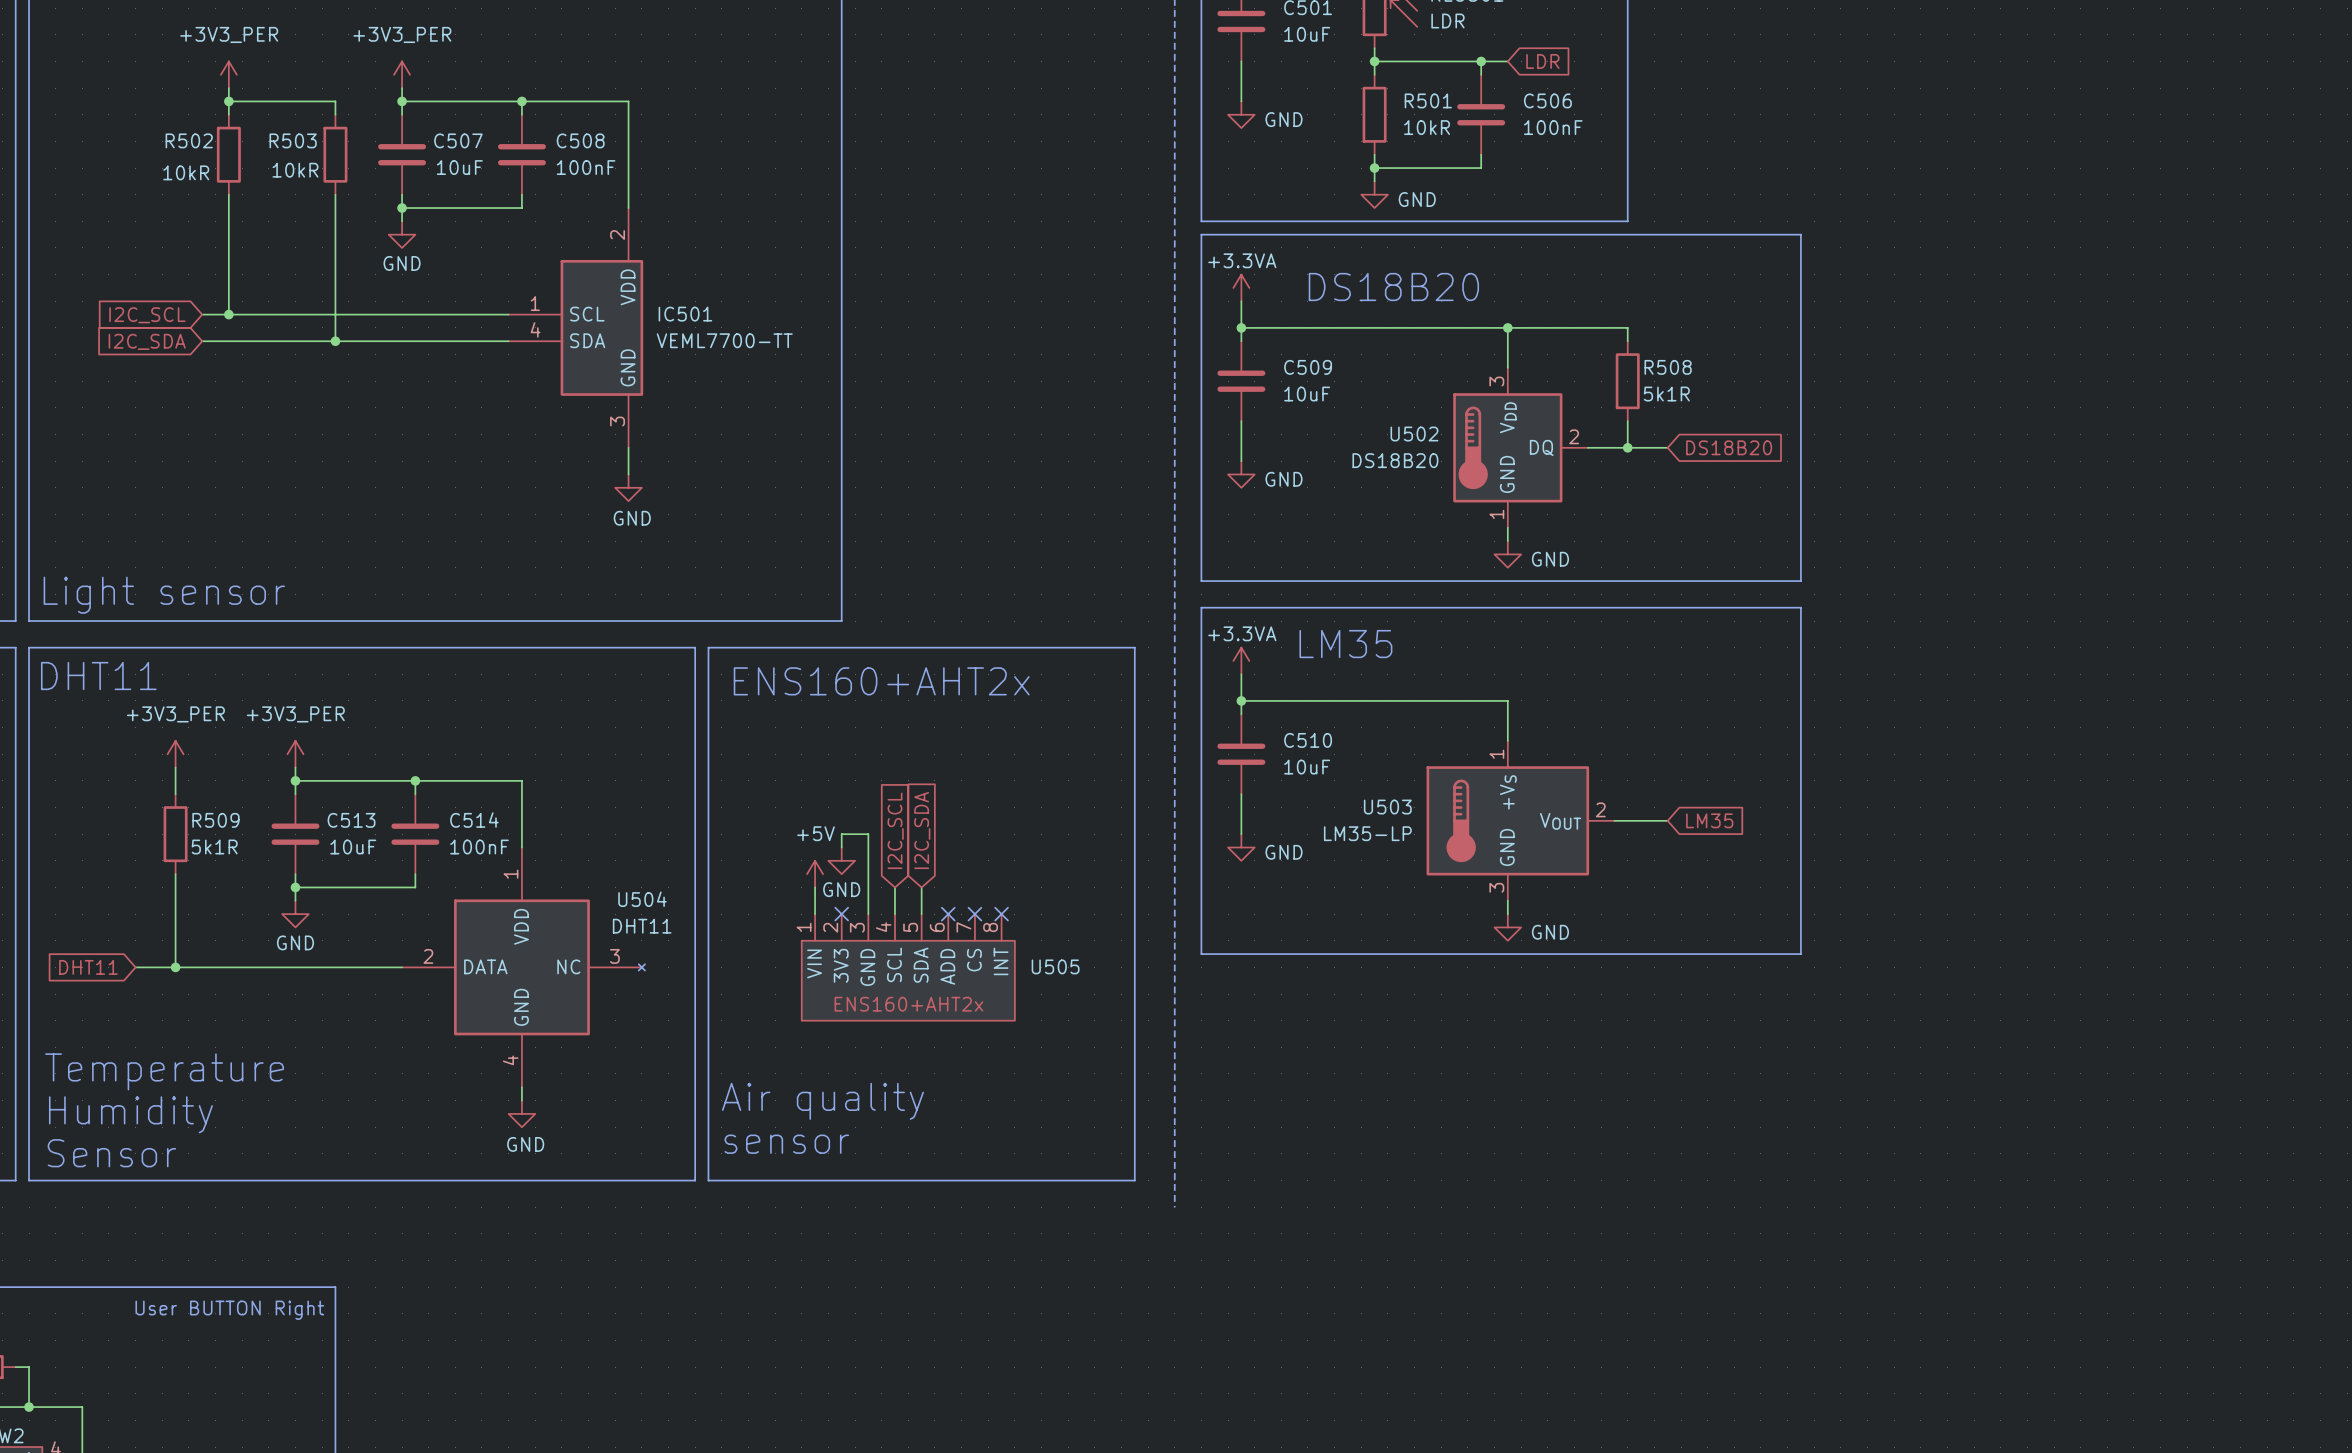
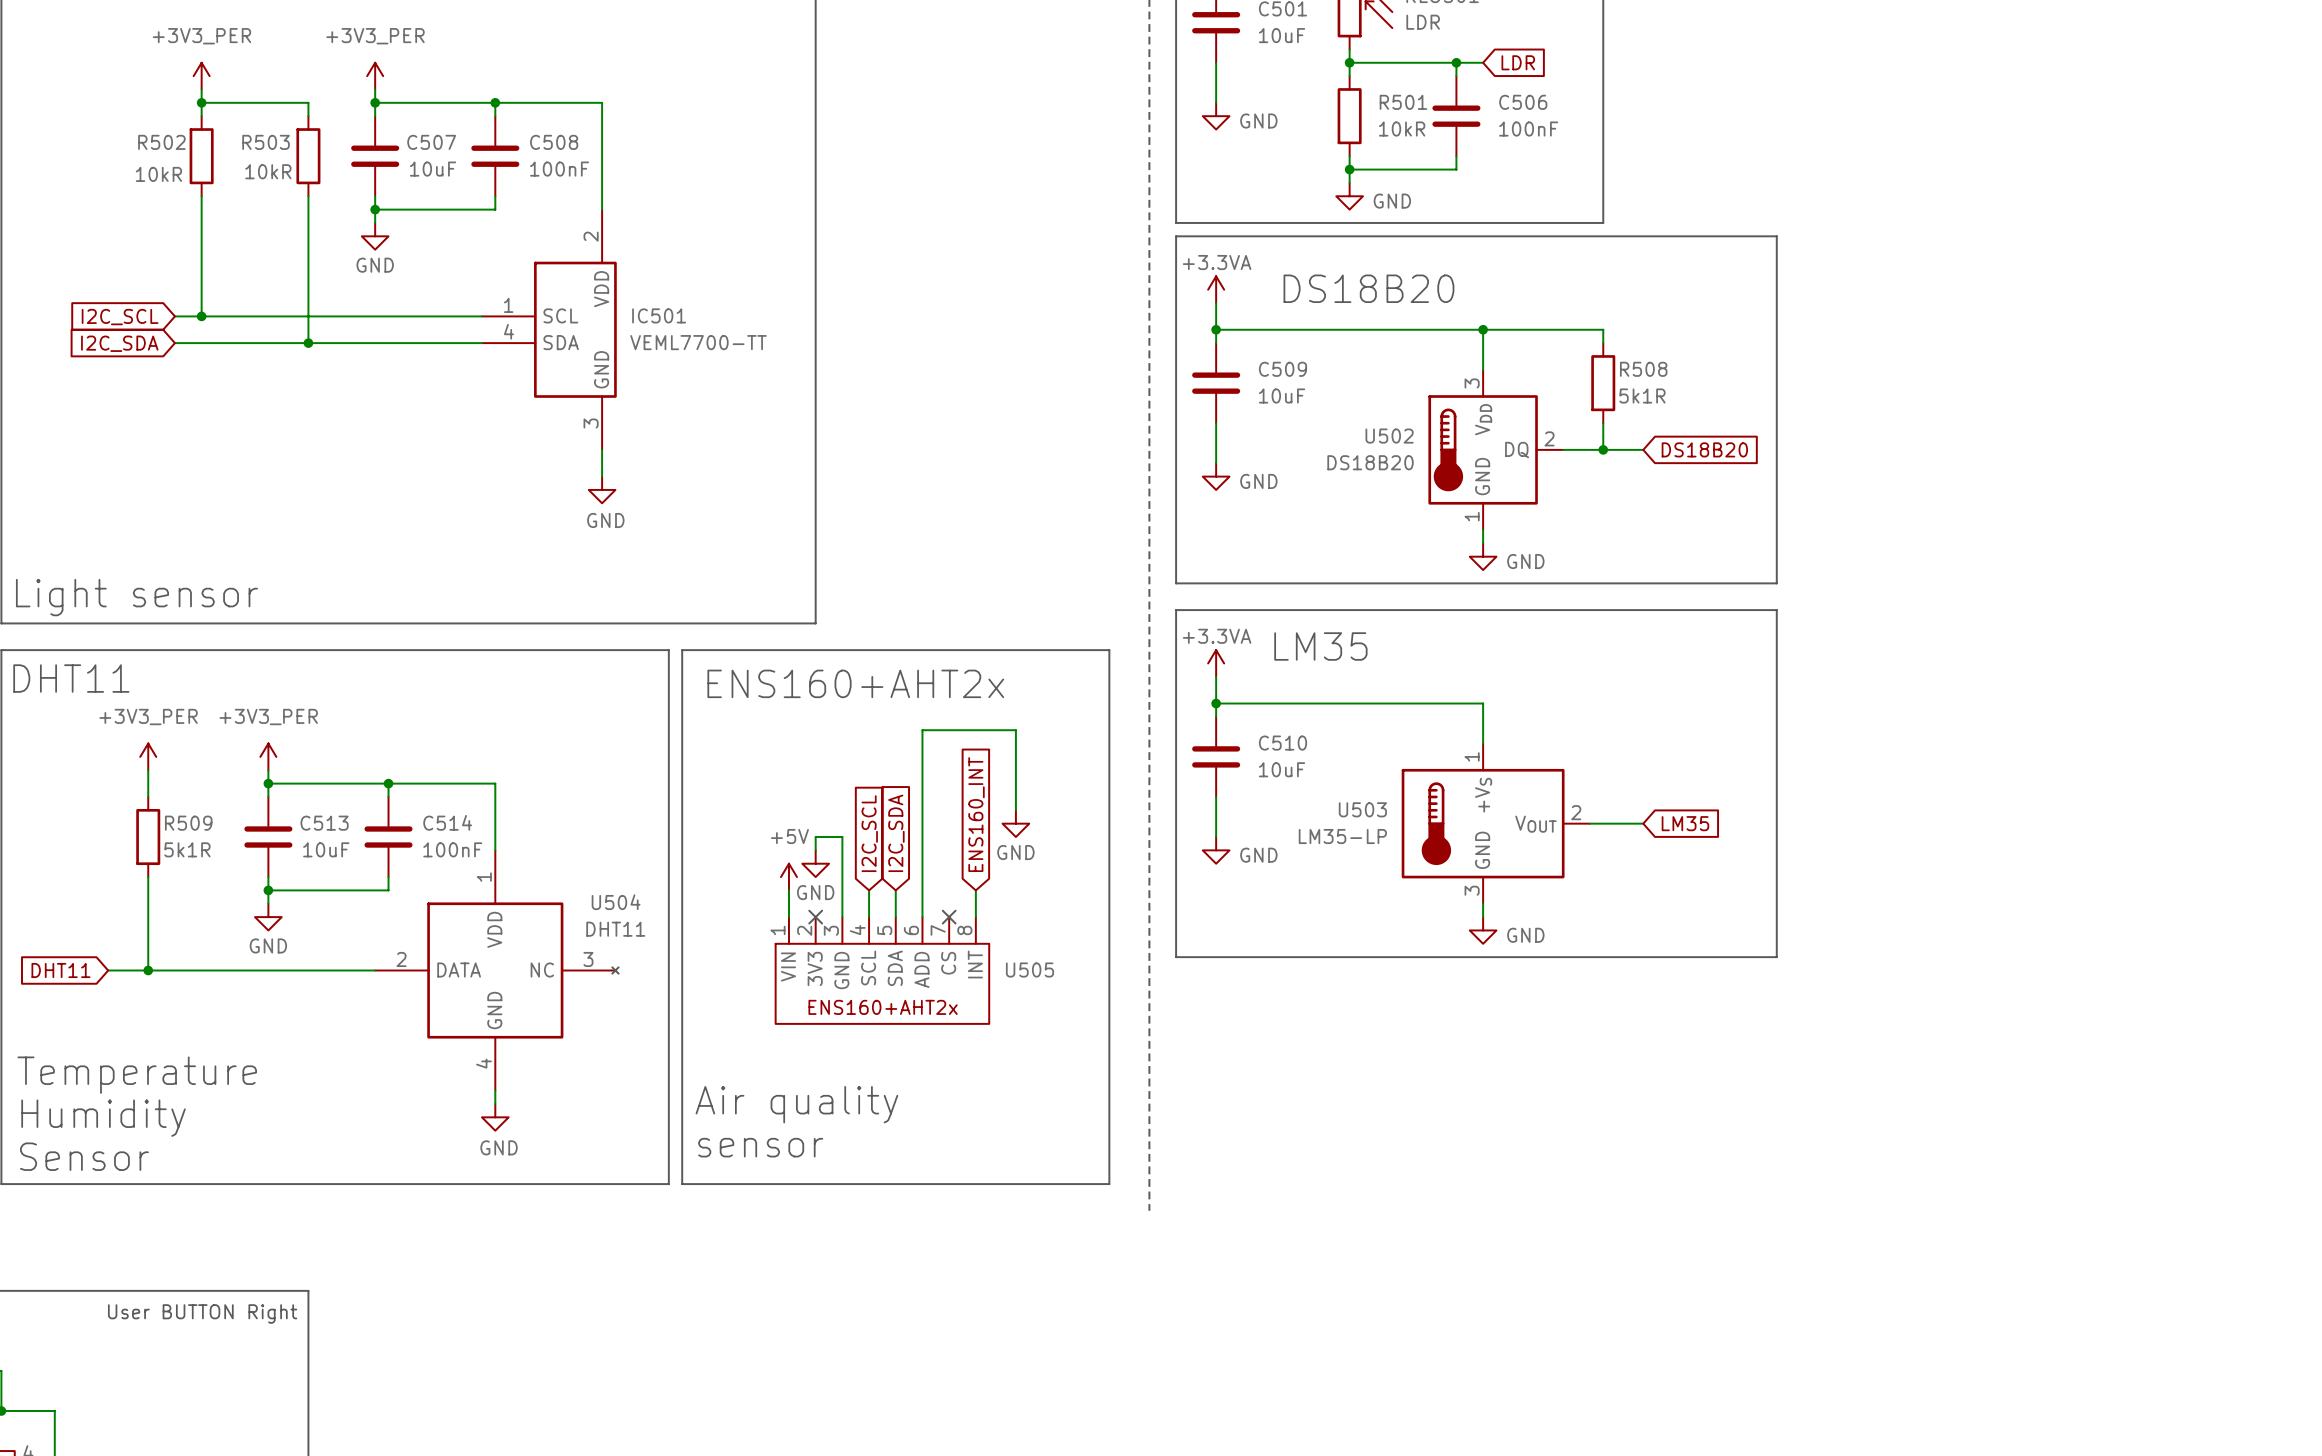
wire: none -> (1015, 810) (1015, 730) (922, 730) (922, 917)
global label: none -> ENS160_INT (976, 814)
power symbol: none -> GND (1015, 823)
wire: none -> (975, 890) (975, 917)
no-connect mark: (948, 914) -> none
no-connect mark: (1001, 914) -> none

